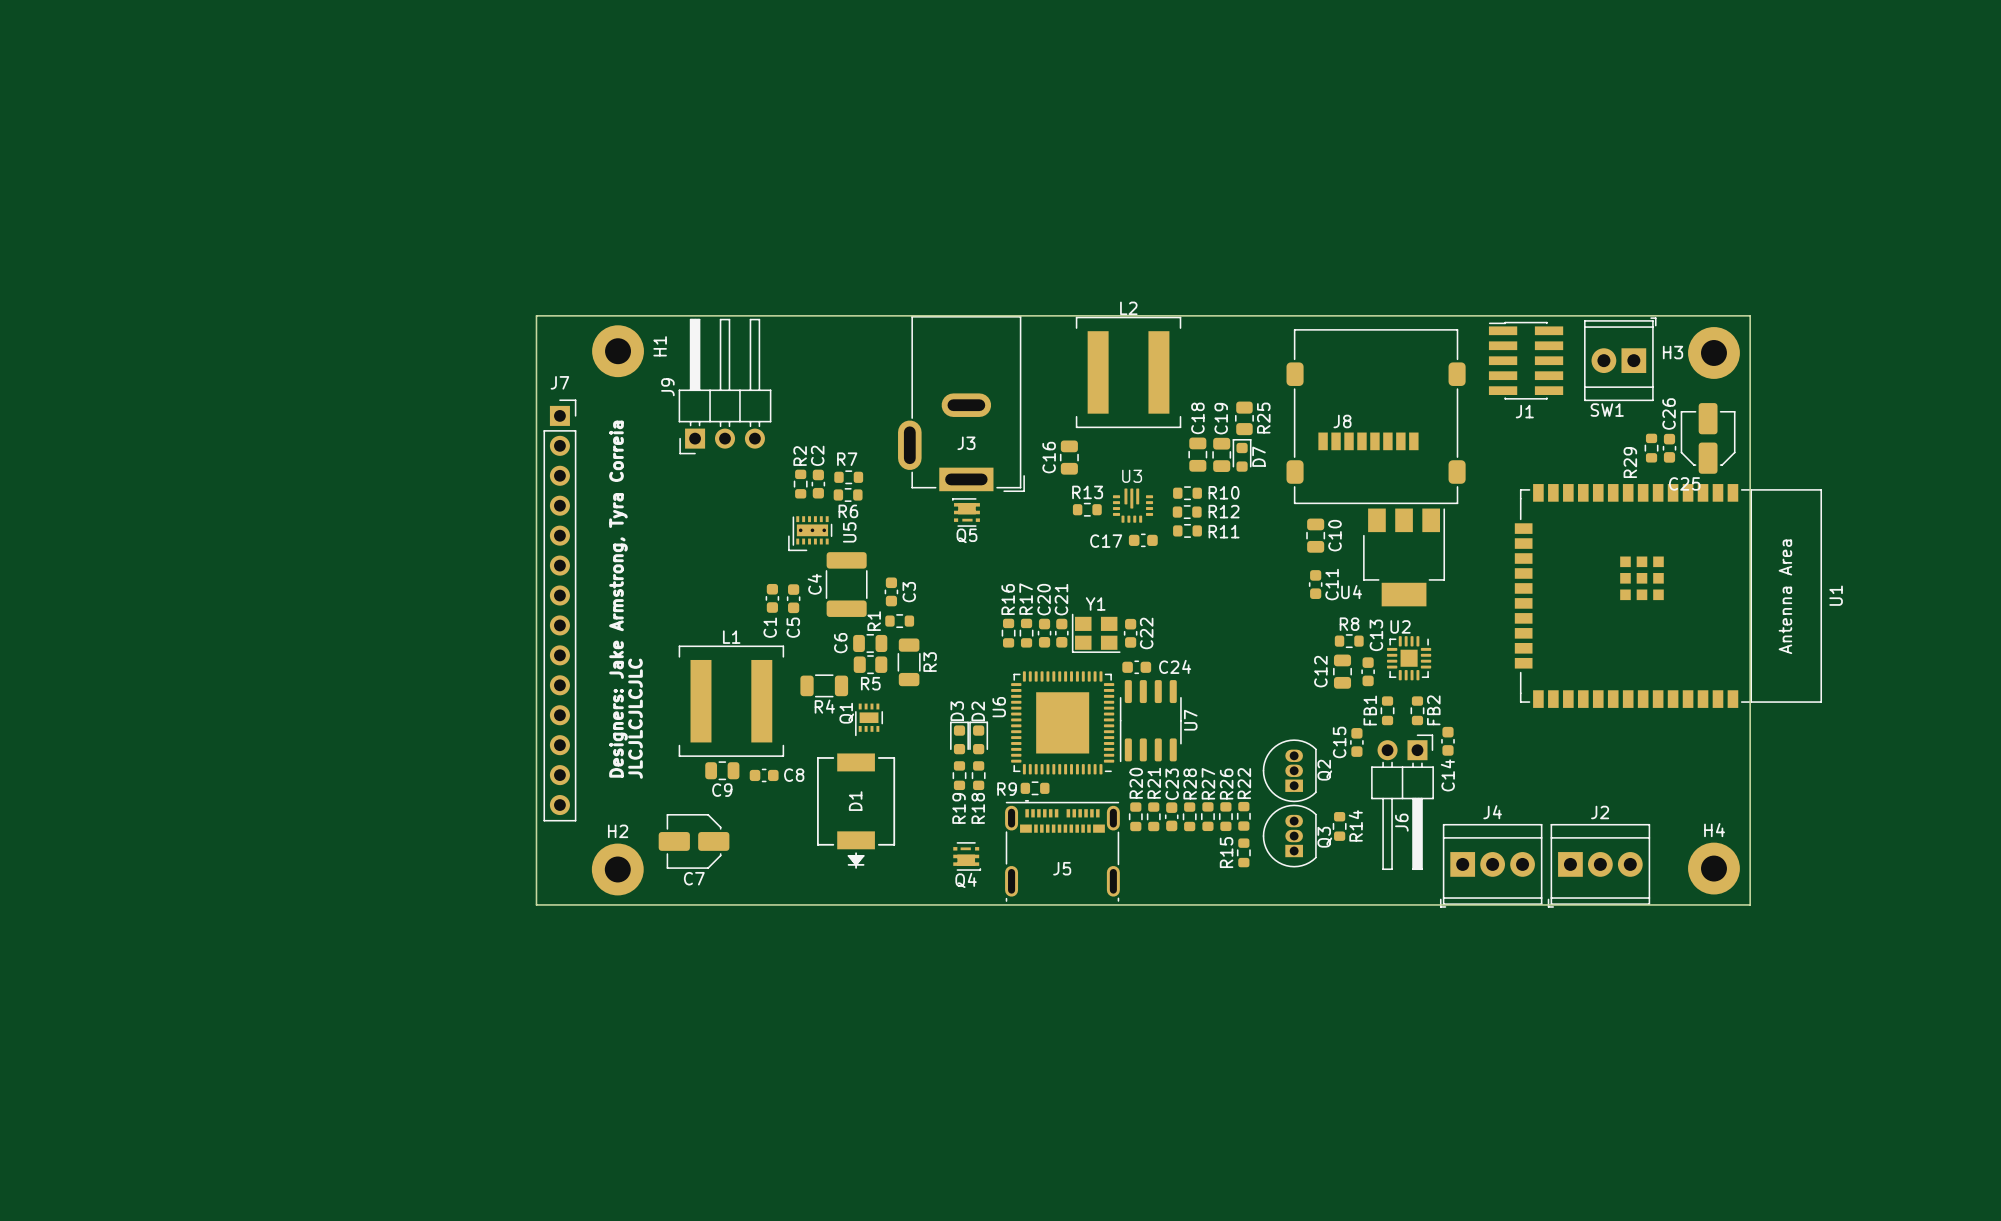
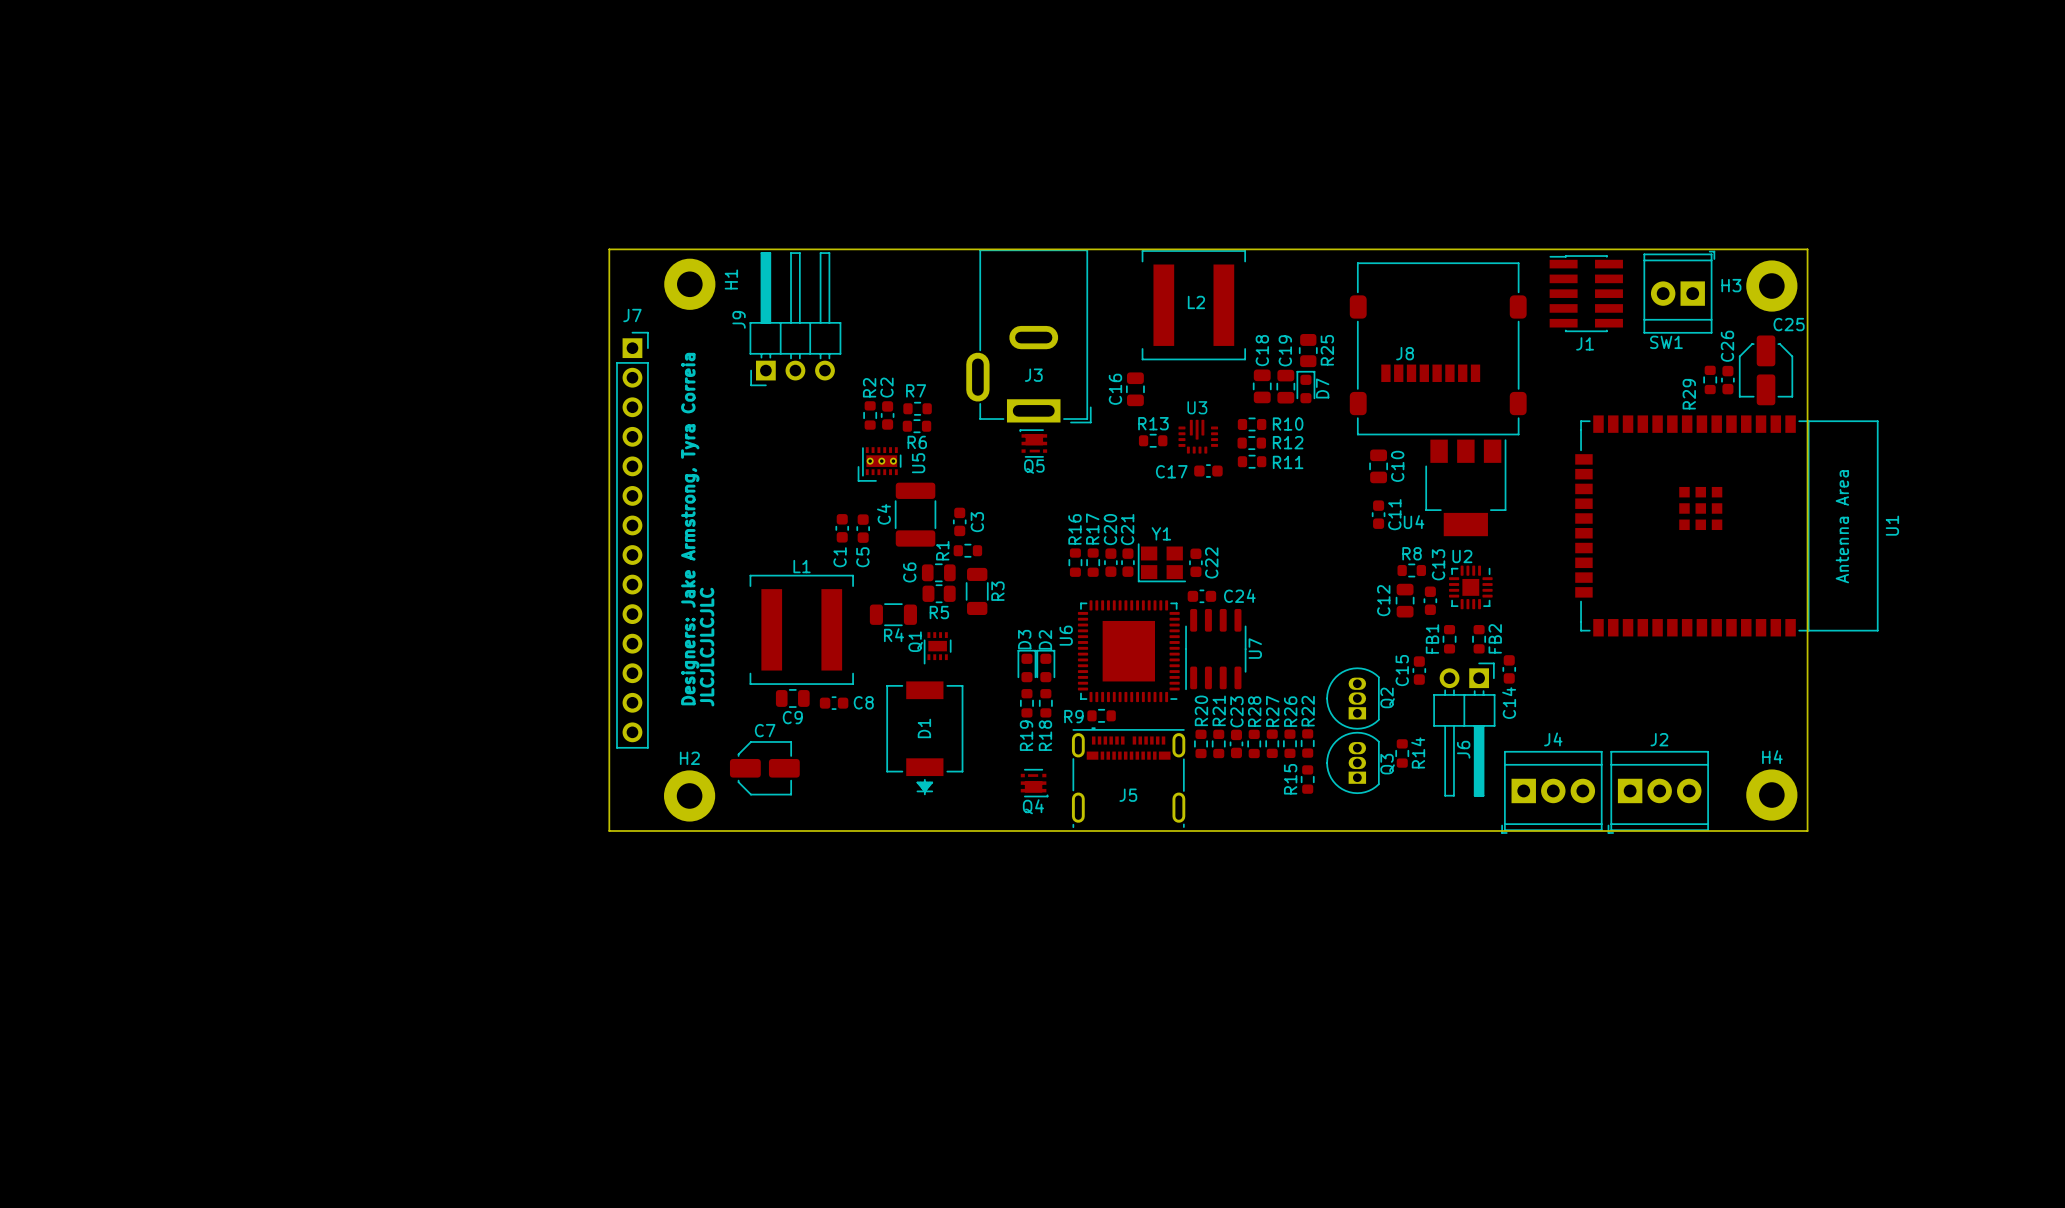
L2 name position: L2 (1128, 308) -> L2 (1196, 302)
C25 rotation: 0° (1708, 438) -> 180° (1766, 370)
C7 rotation: 0° (694, 841) -> 180° (764, 768)

